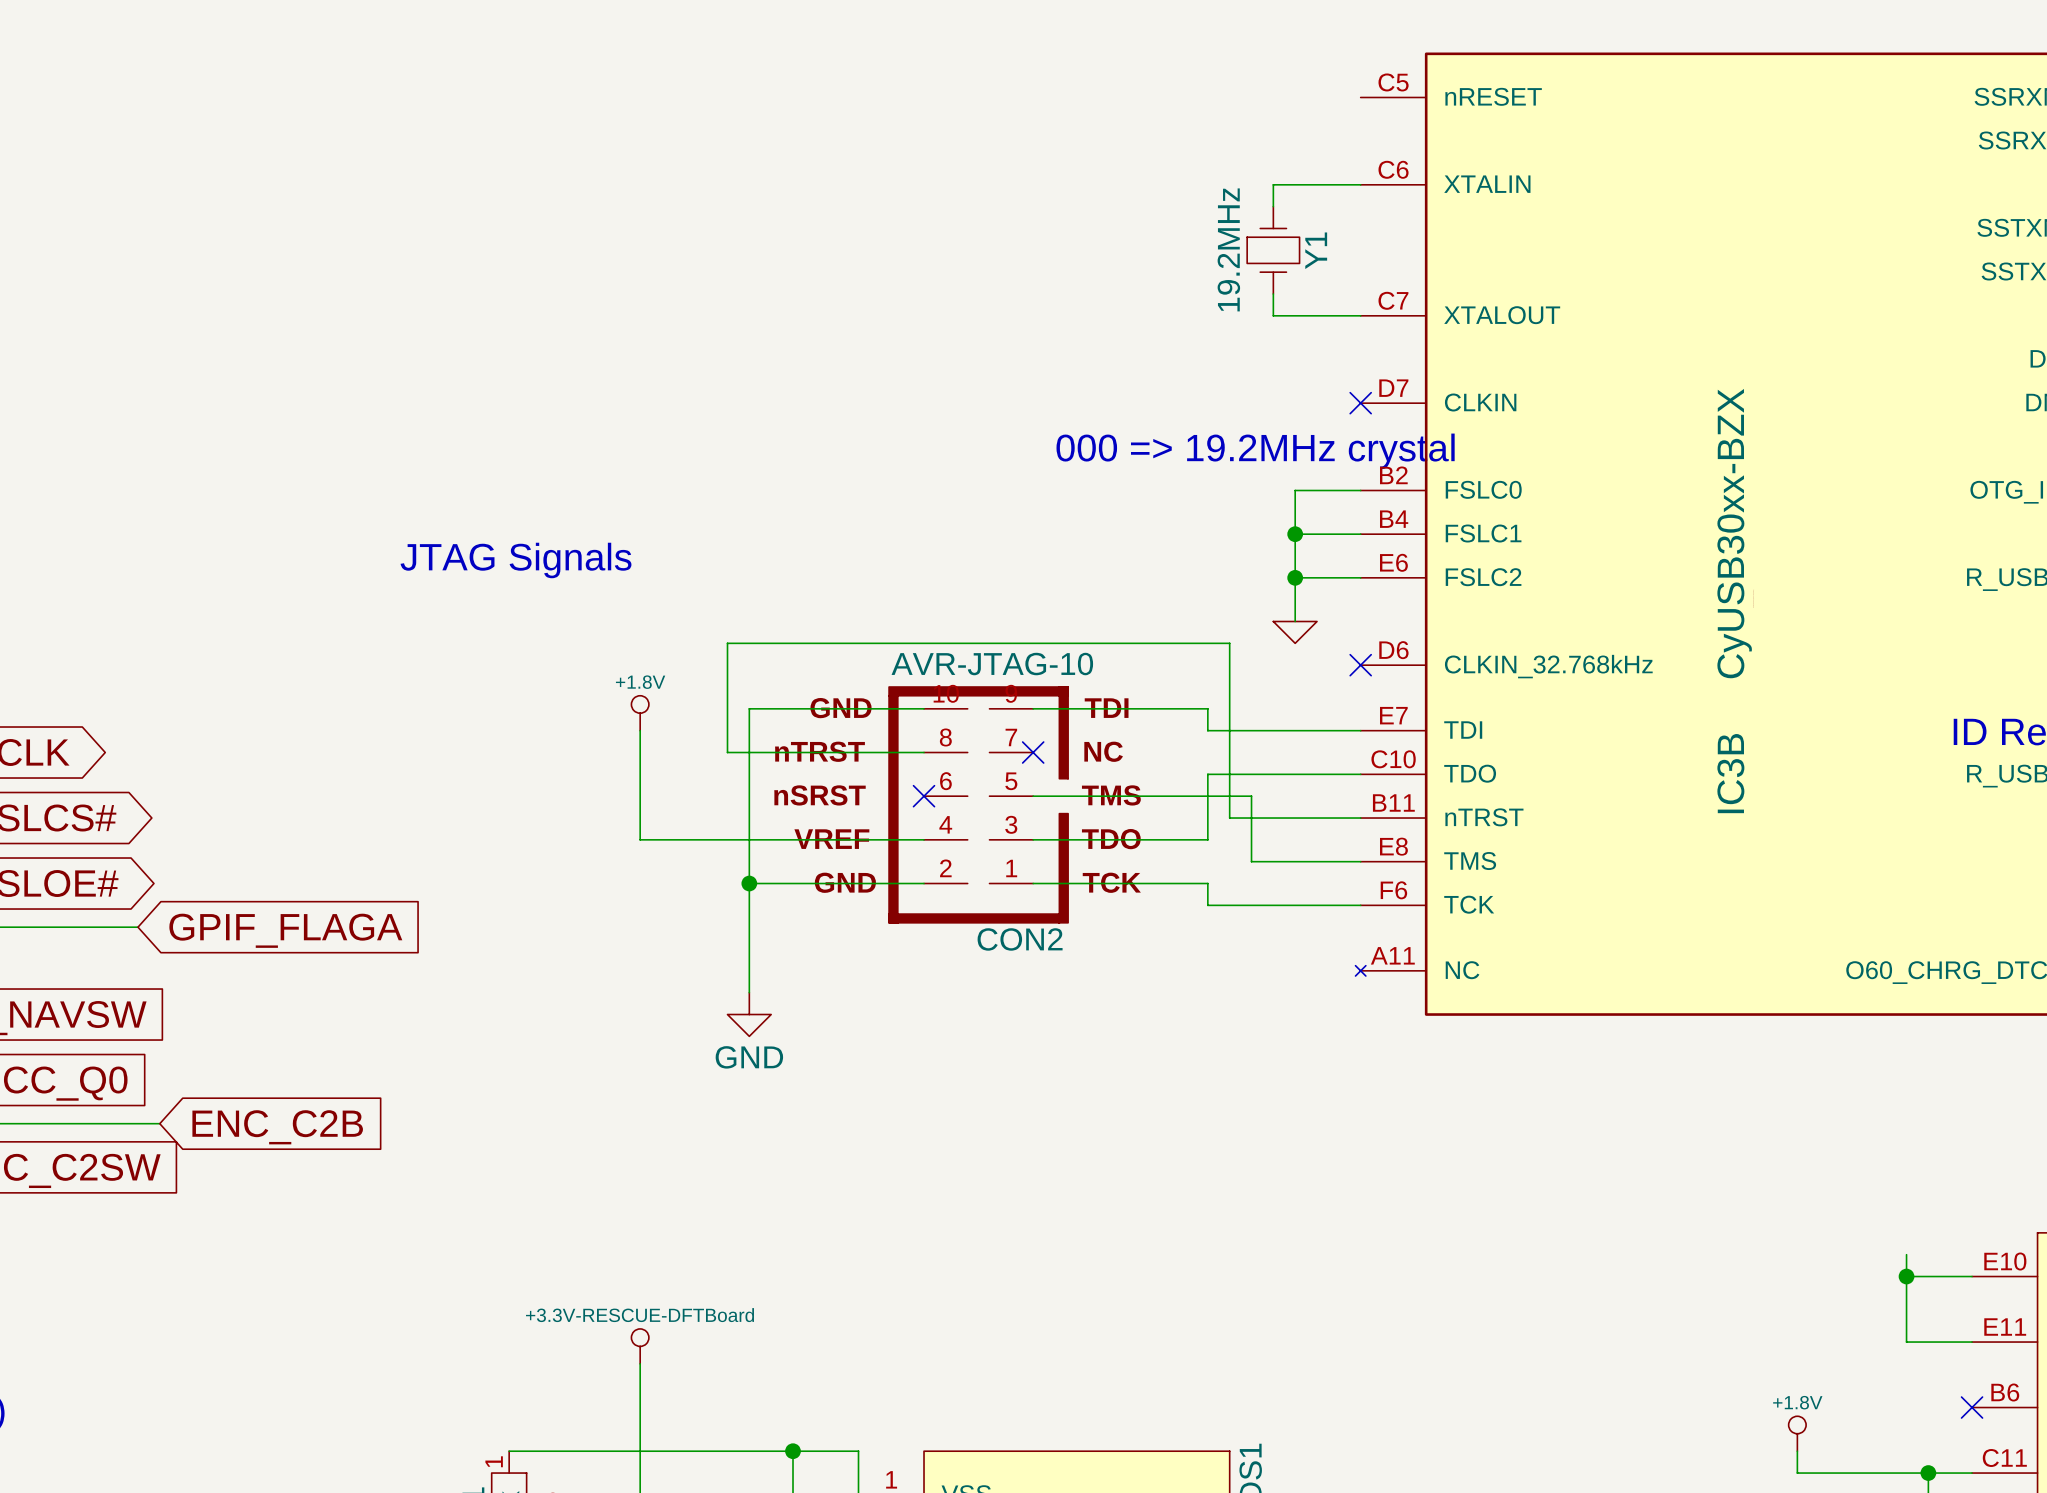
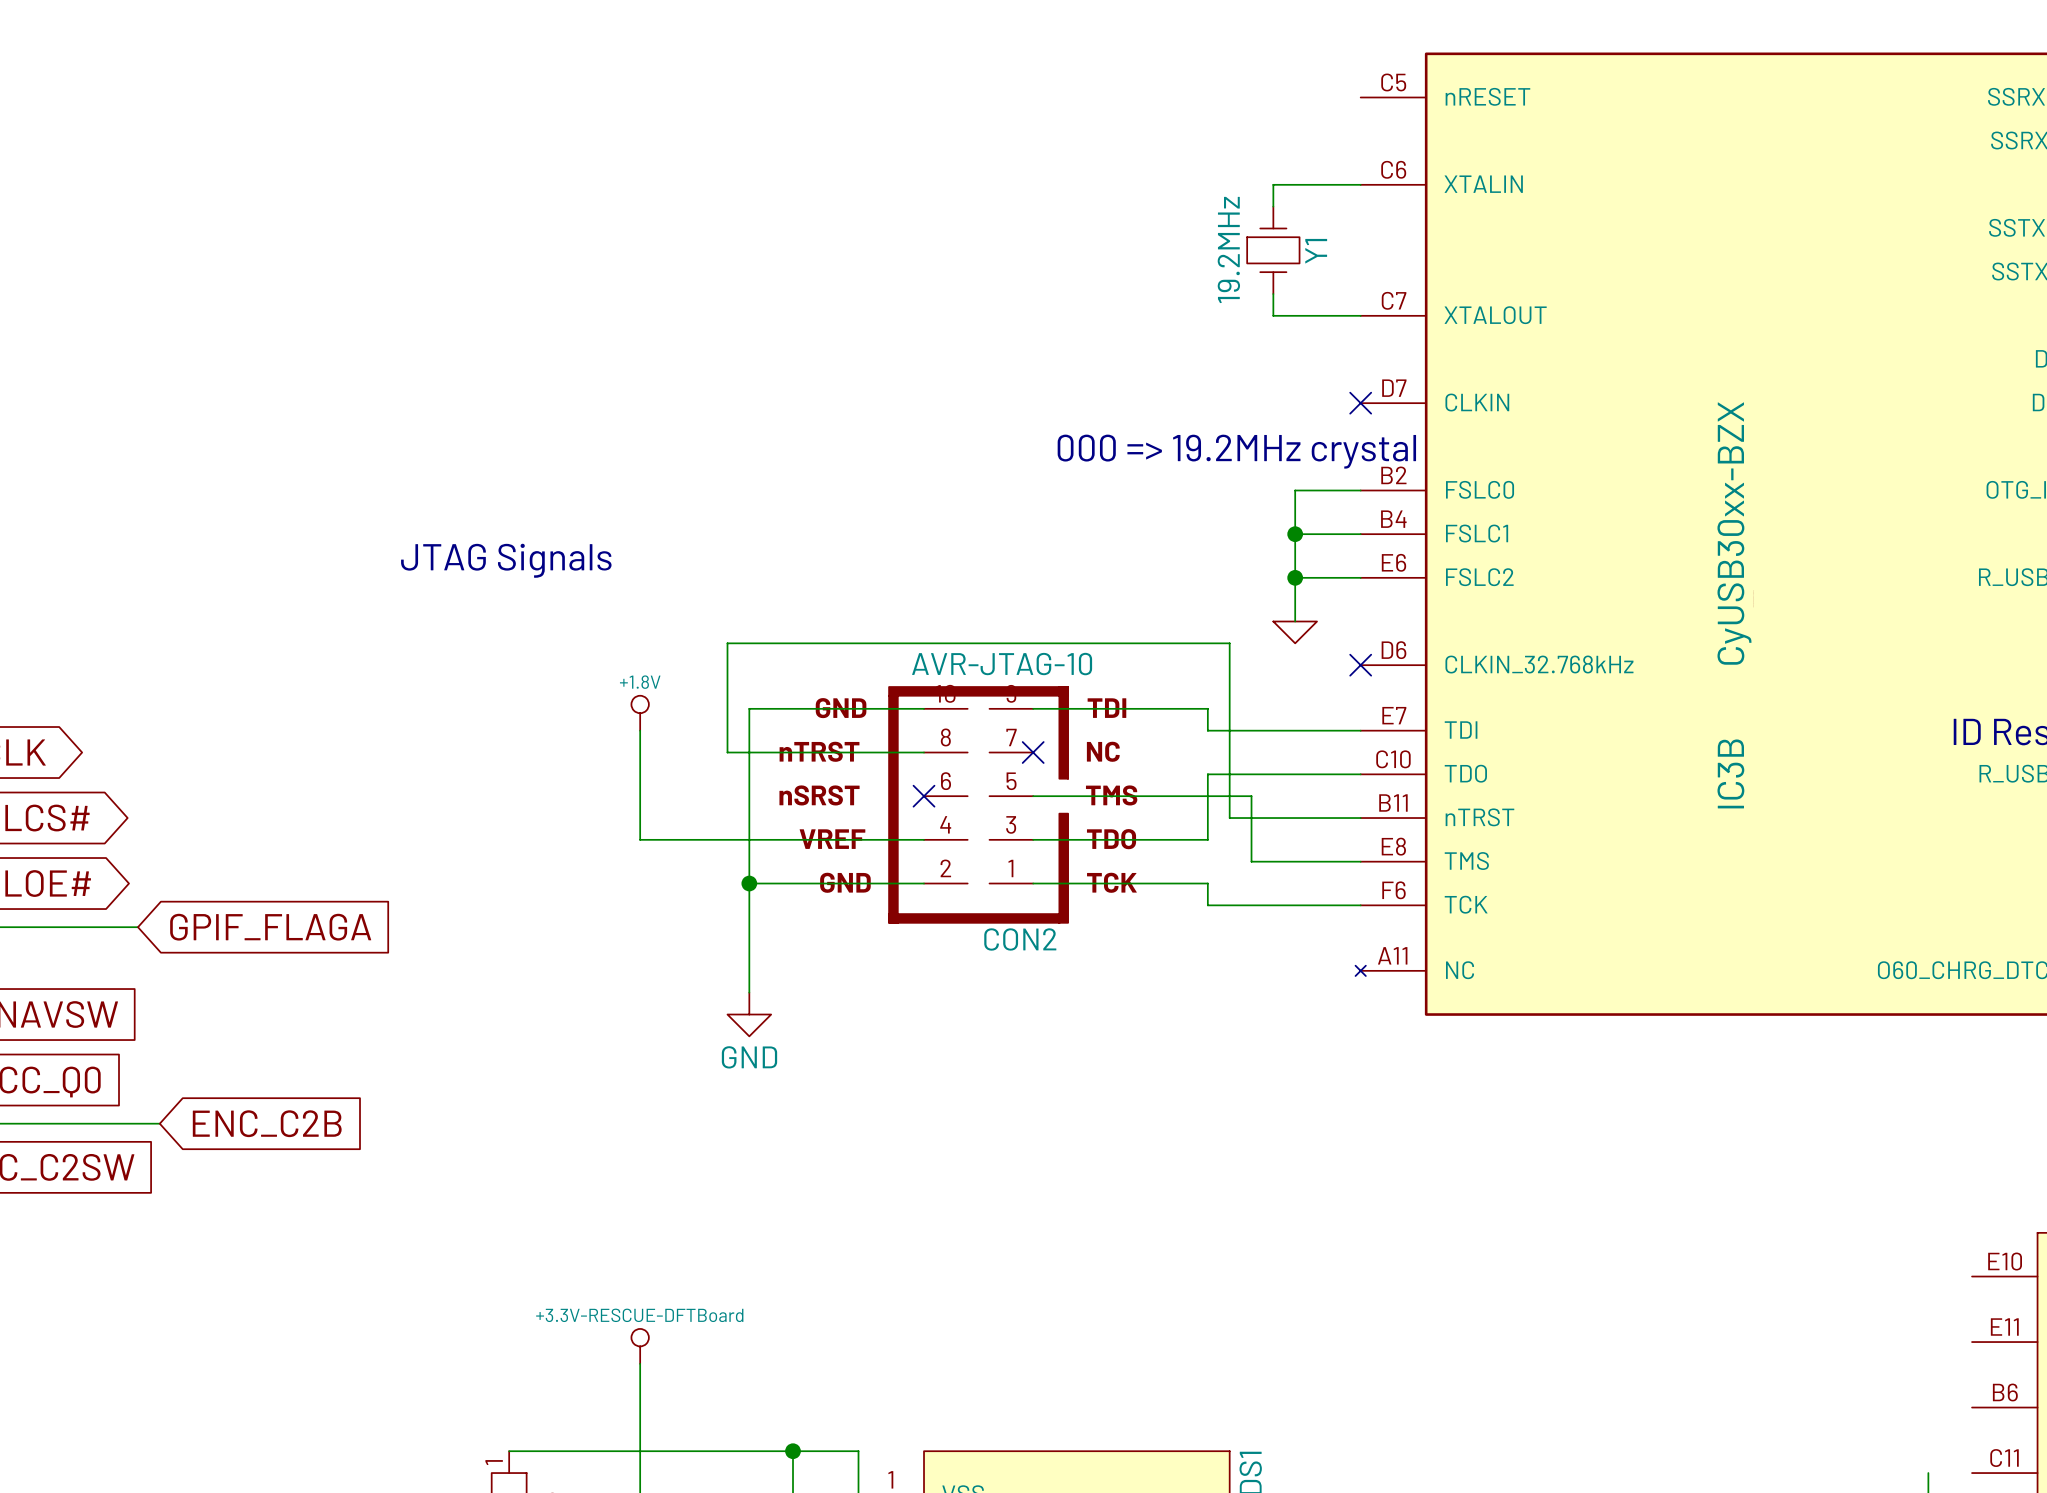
wire: (1906, 1254) (1906, 1342) (1972, 1342) -> none
wire: (1906, 1276) (1972, 1276) -> none
junction: (1906, 1276) -> none
no-connect mark: (1972, 1407) -> none
power symbol: +1.8V (1797, 1433) -> none
wire: (1797, 1451) (1797, 1473) (1972, 1473) -> none
junction: (1928, 1473) -> none

